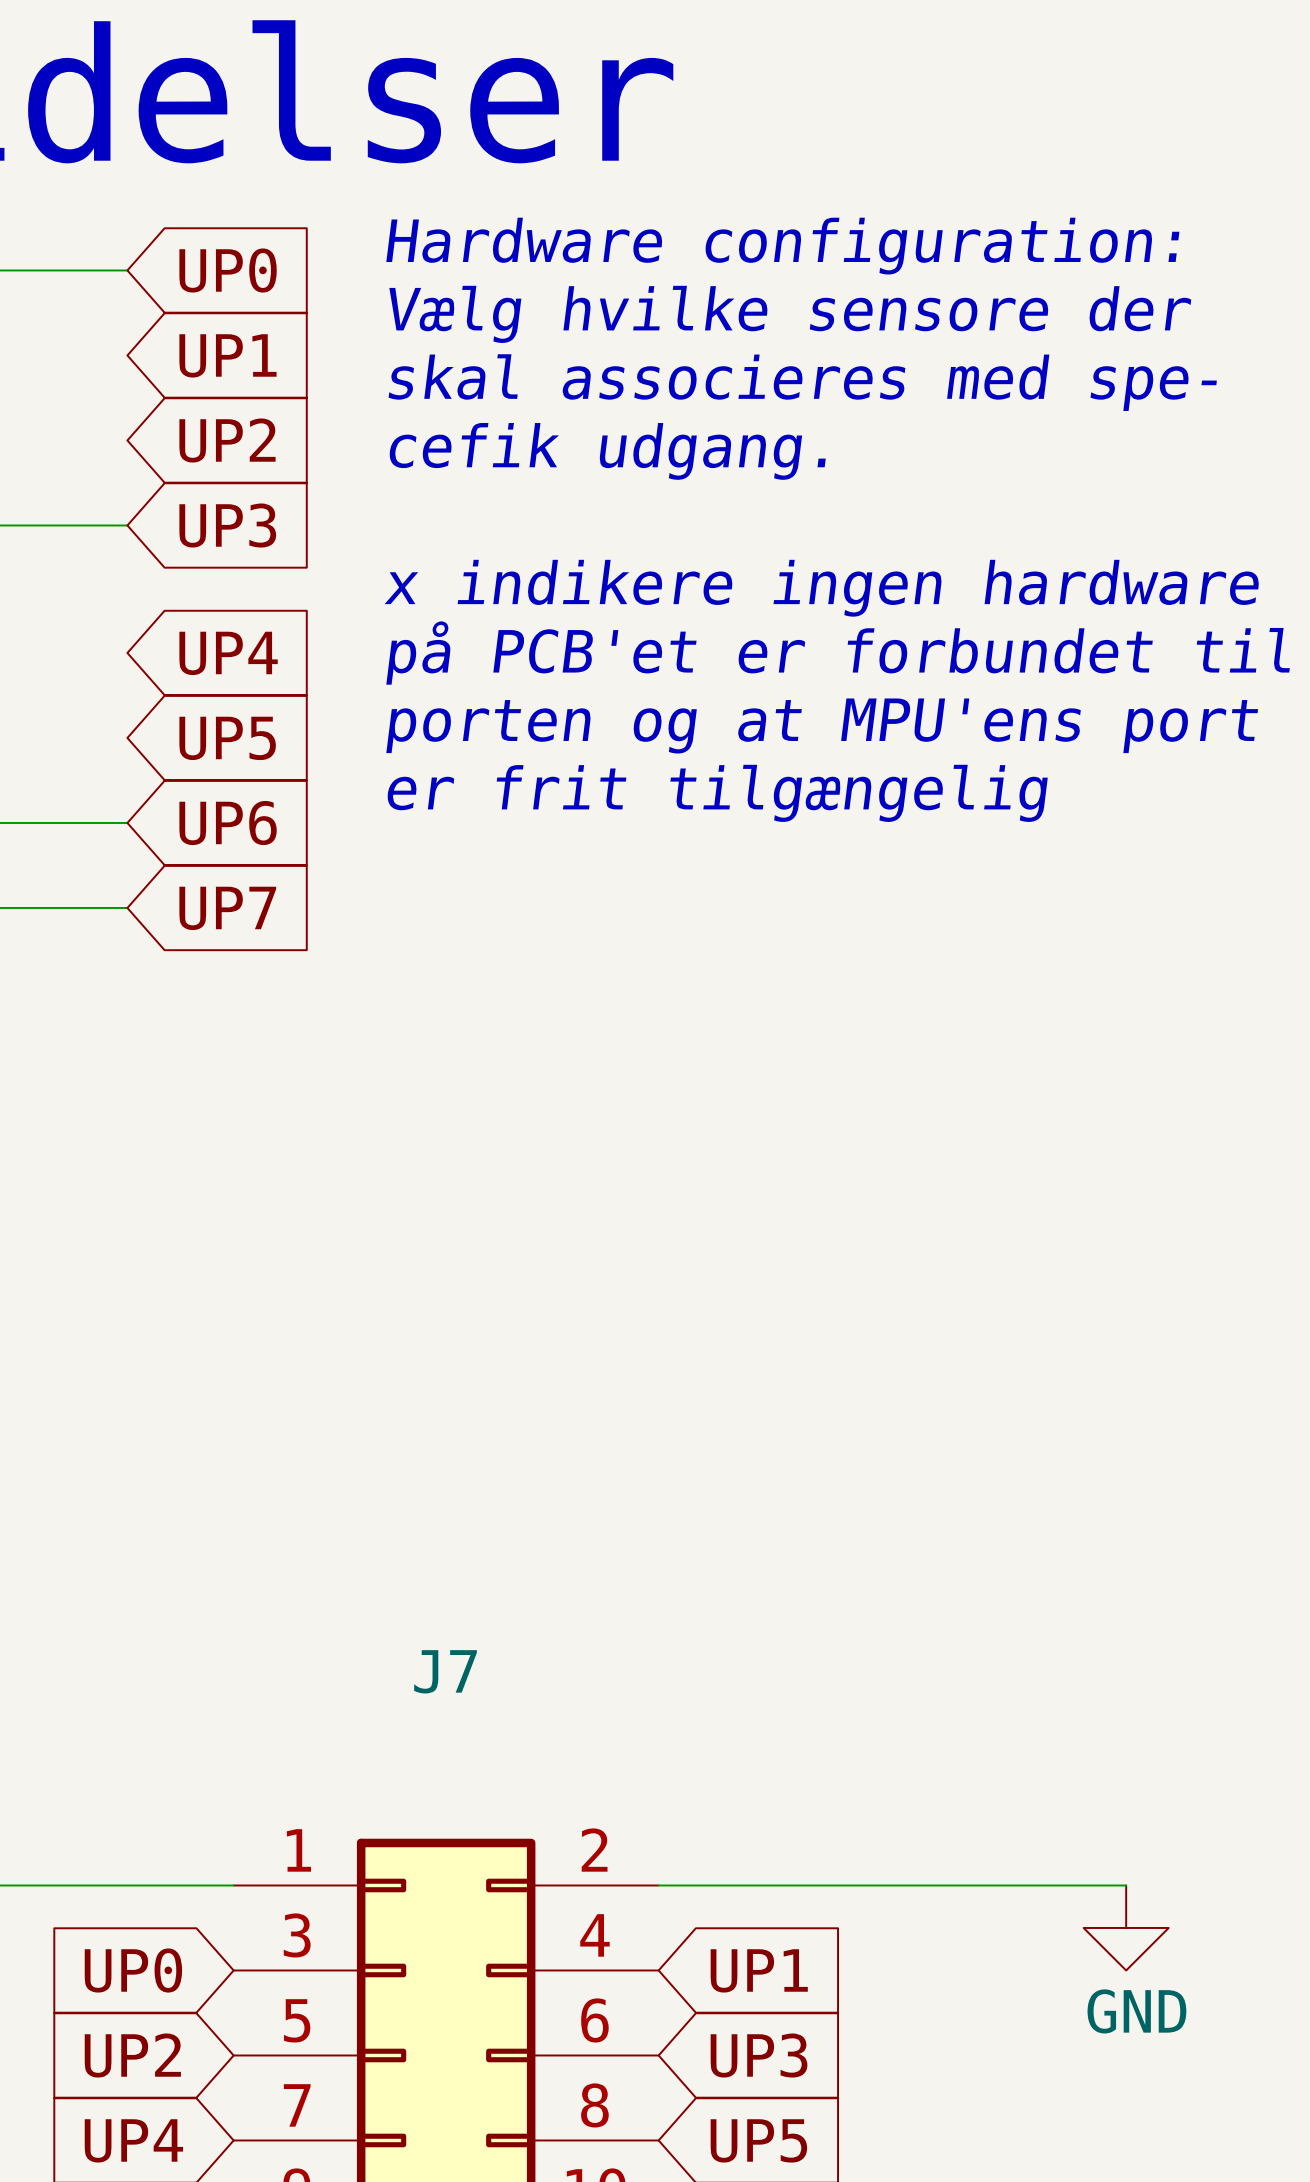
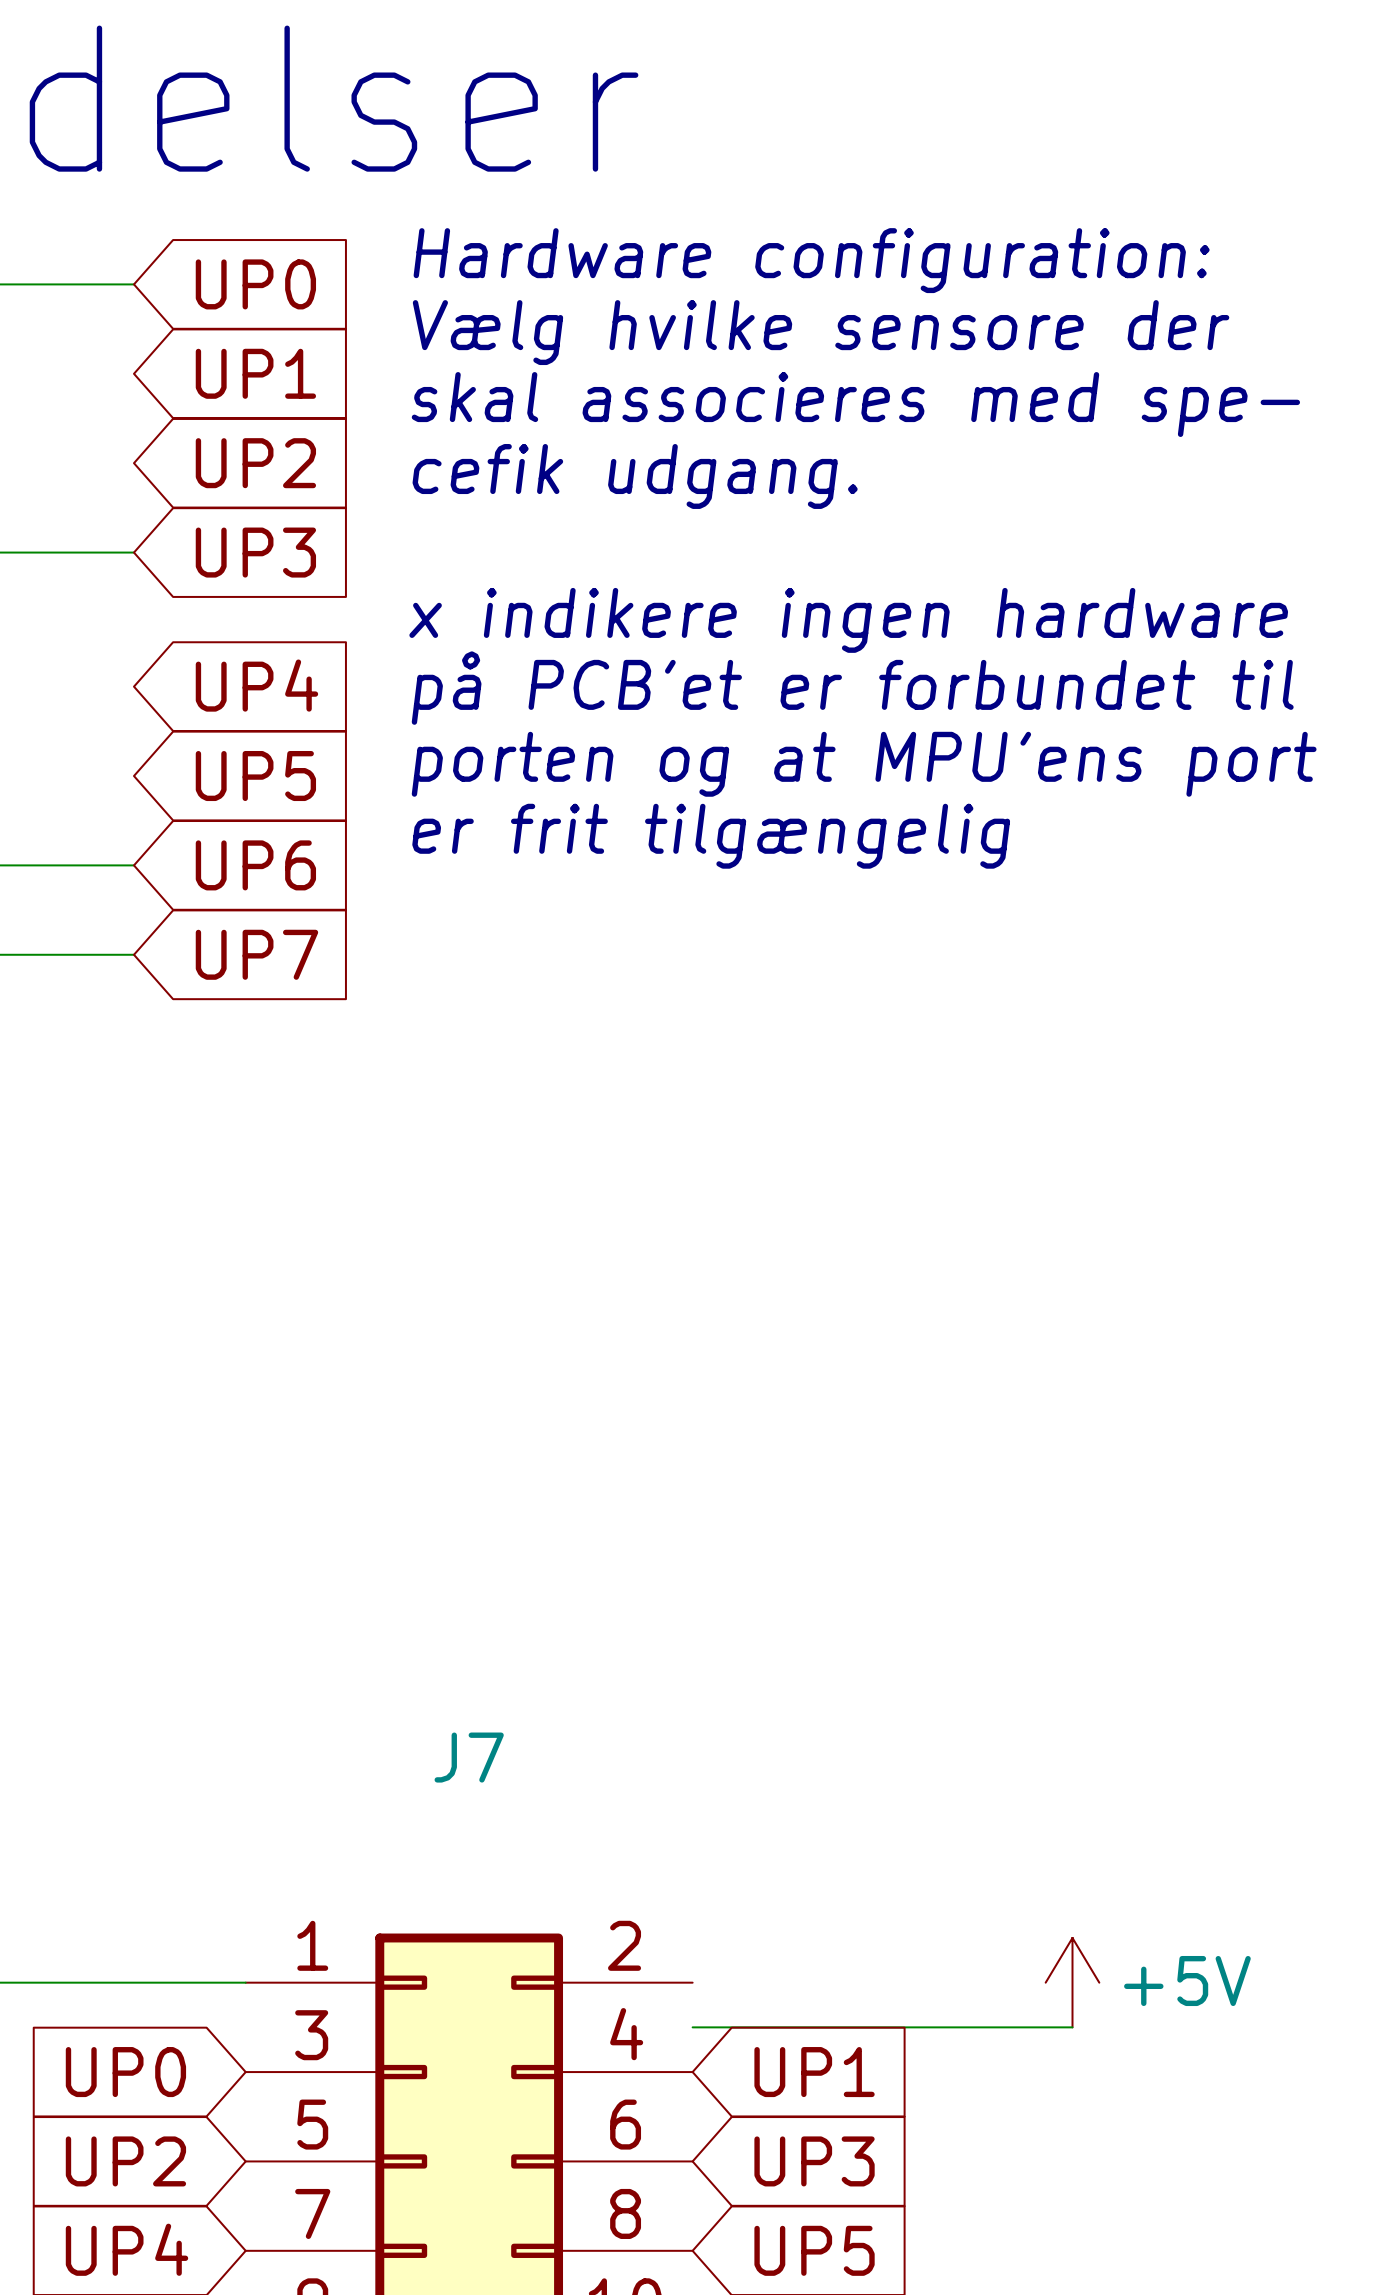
wire: (658, 1885) (1126, 1885) -> none
power symbol: none -> +5V (1072, 1982)
wire: none -> (692, 2027) (1072, 2027)
power symbol: GND (1126, 1927) -> none

